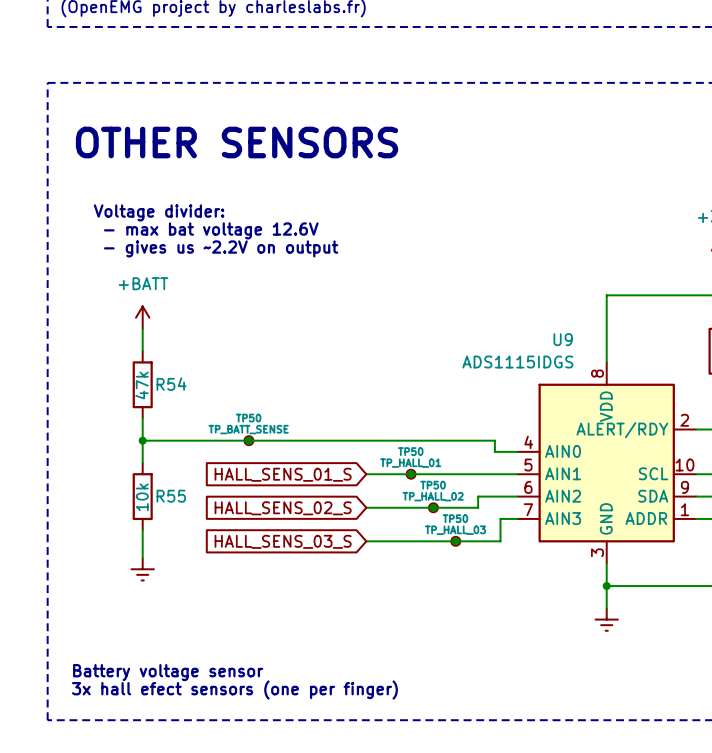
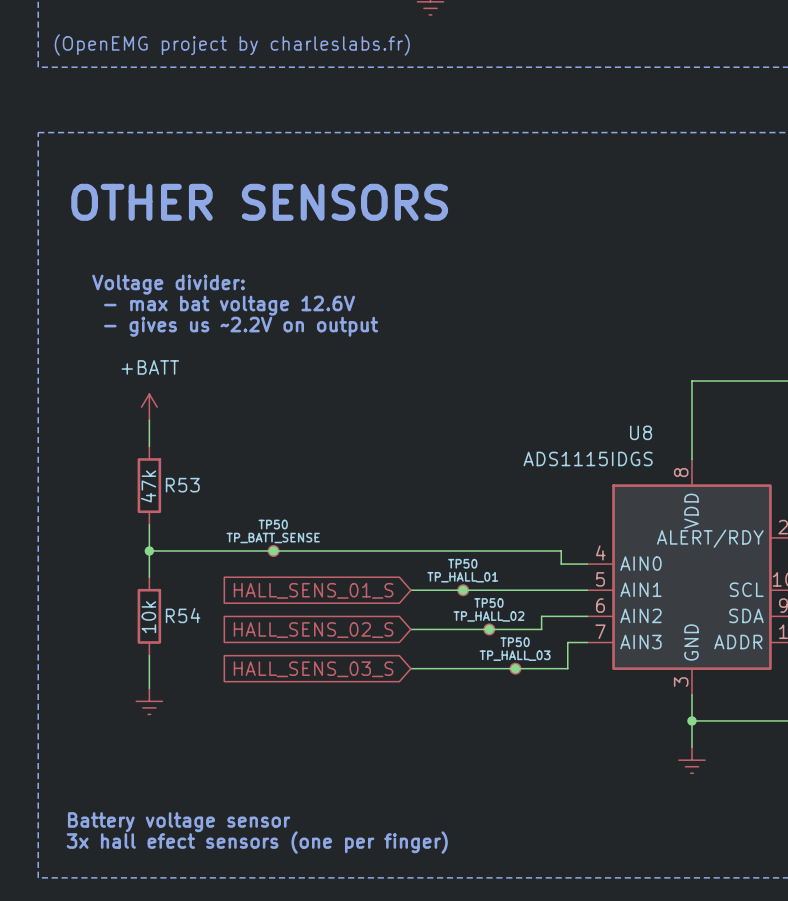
U9 name: U9 (563, 339) -> U8 (641, 432)
R54 name: R54 (171, 384) -> R53 (182, 485)
R55 name: R55 (171, 496) -> R54 (183, 615)

